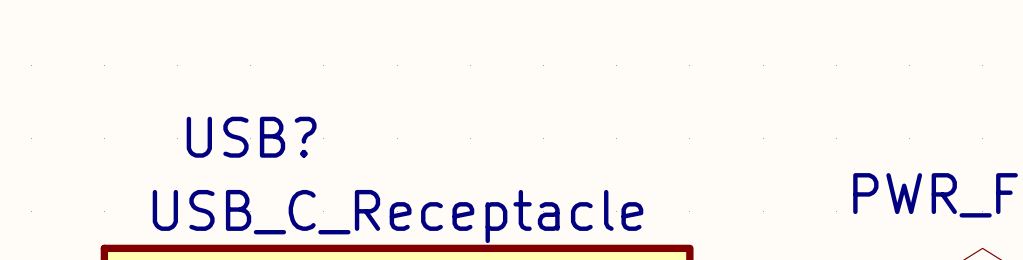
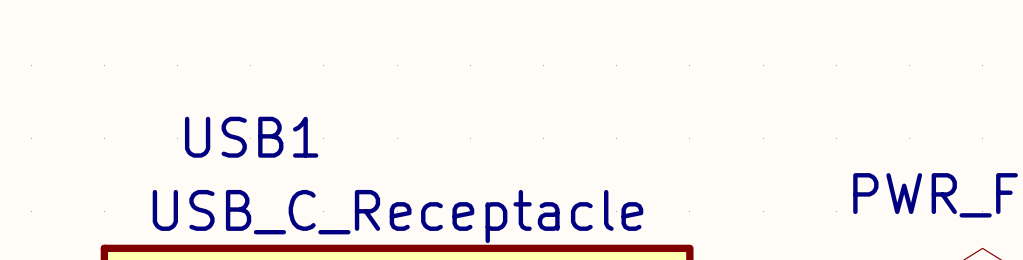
USB? name: USB? (251, 137) -> USB1 (251, 137)

